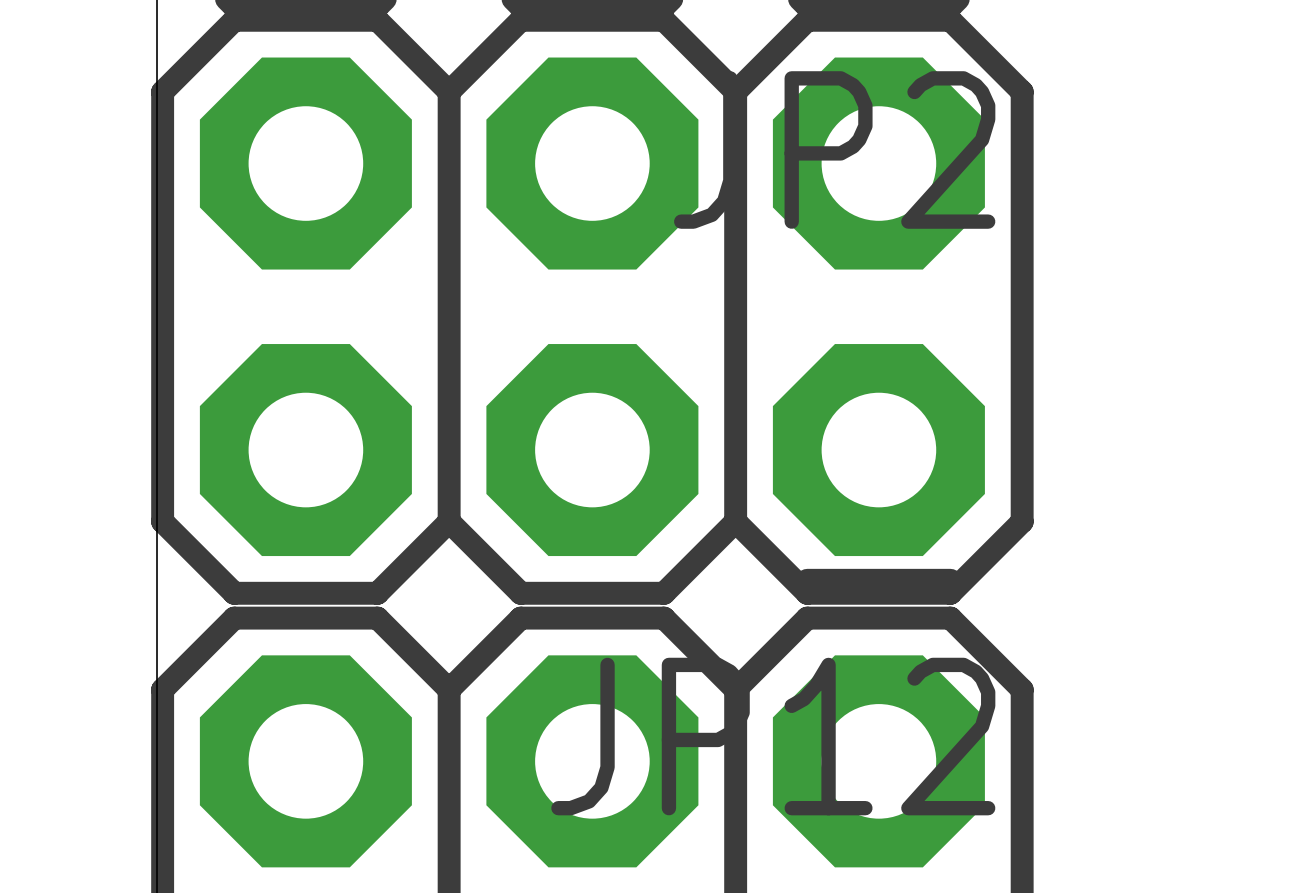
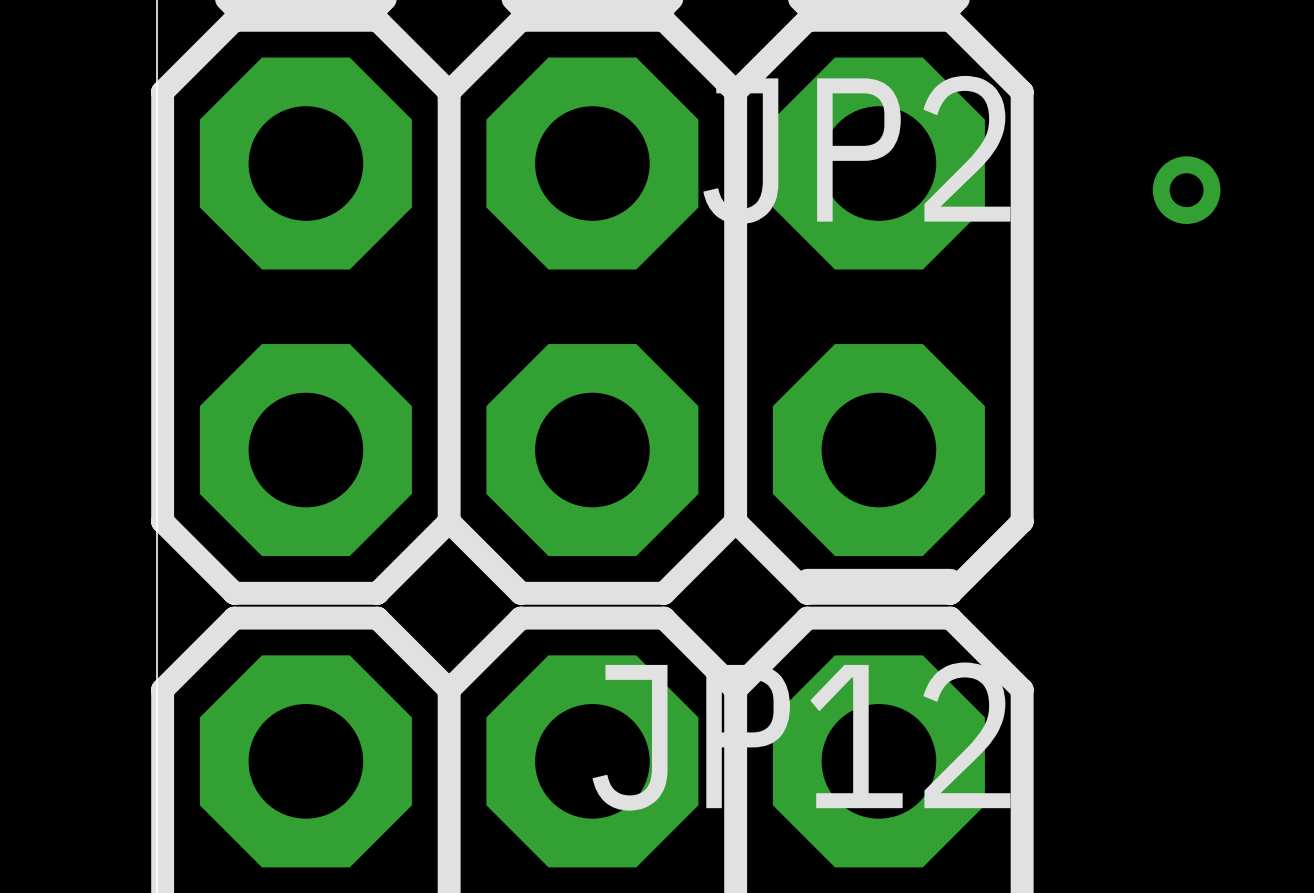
part: none -> (1186, 190)

